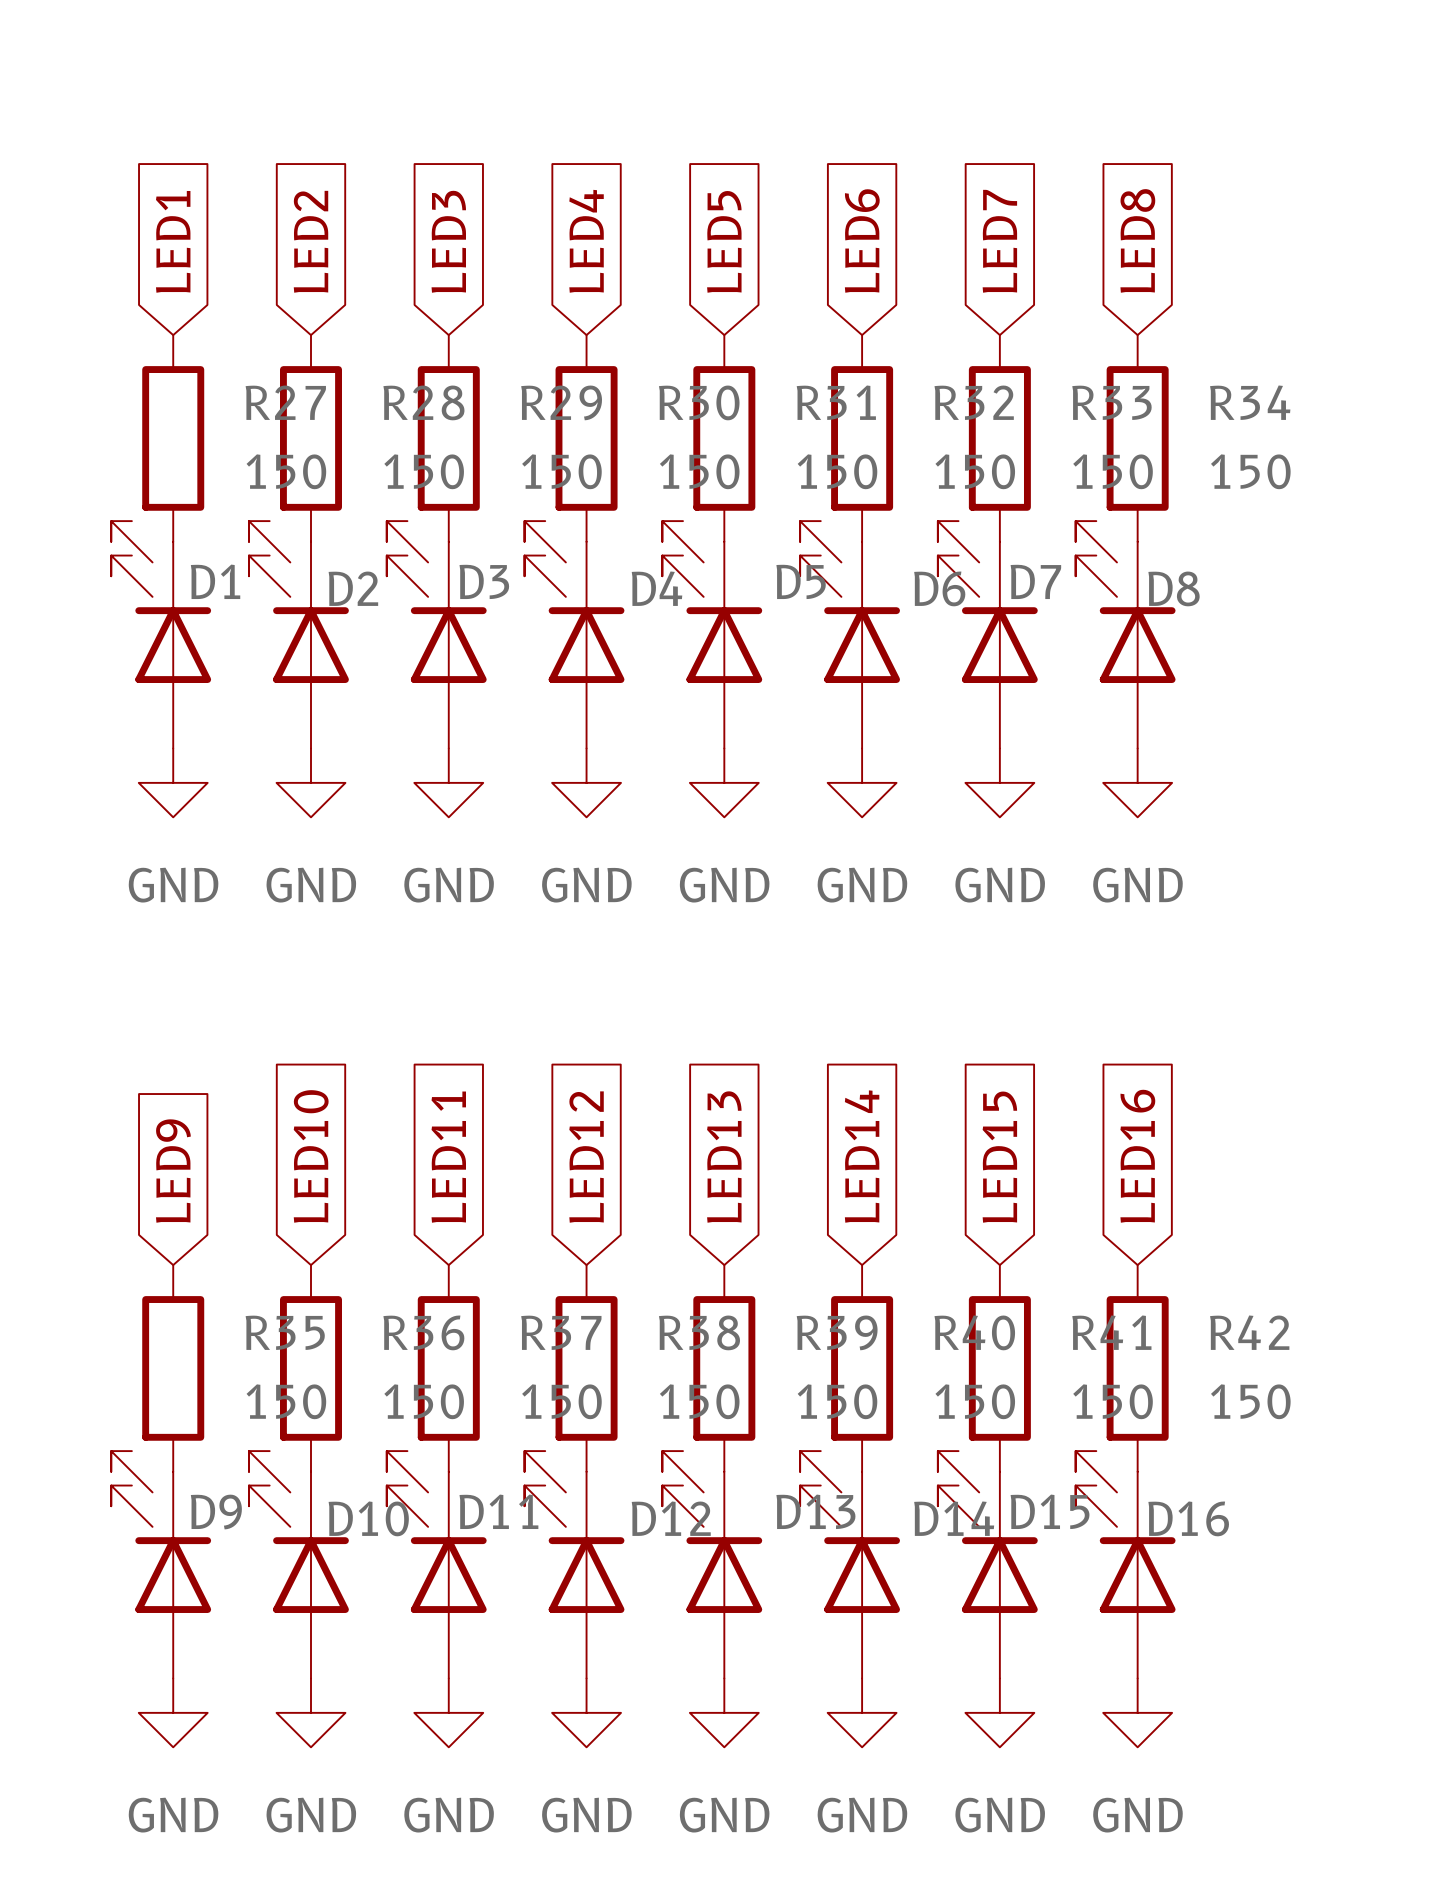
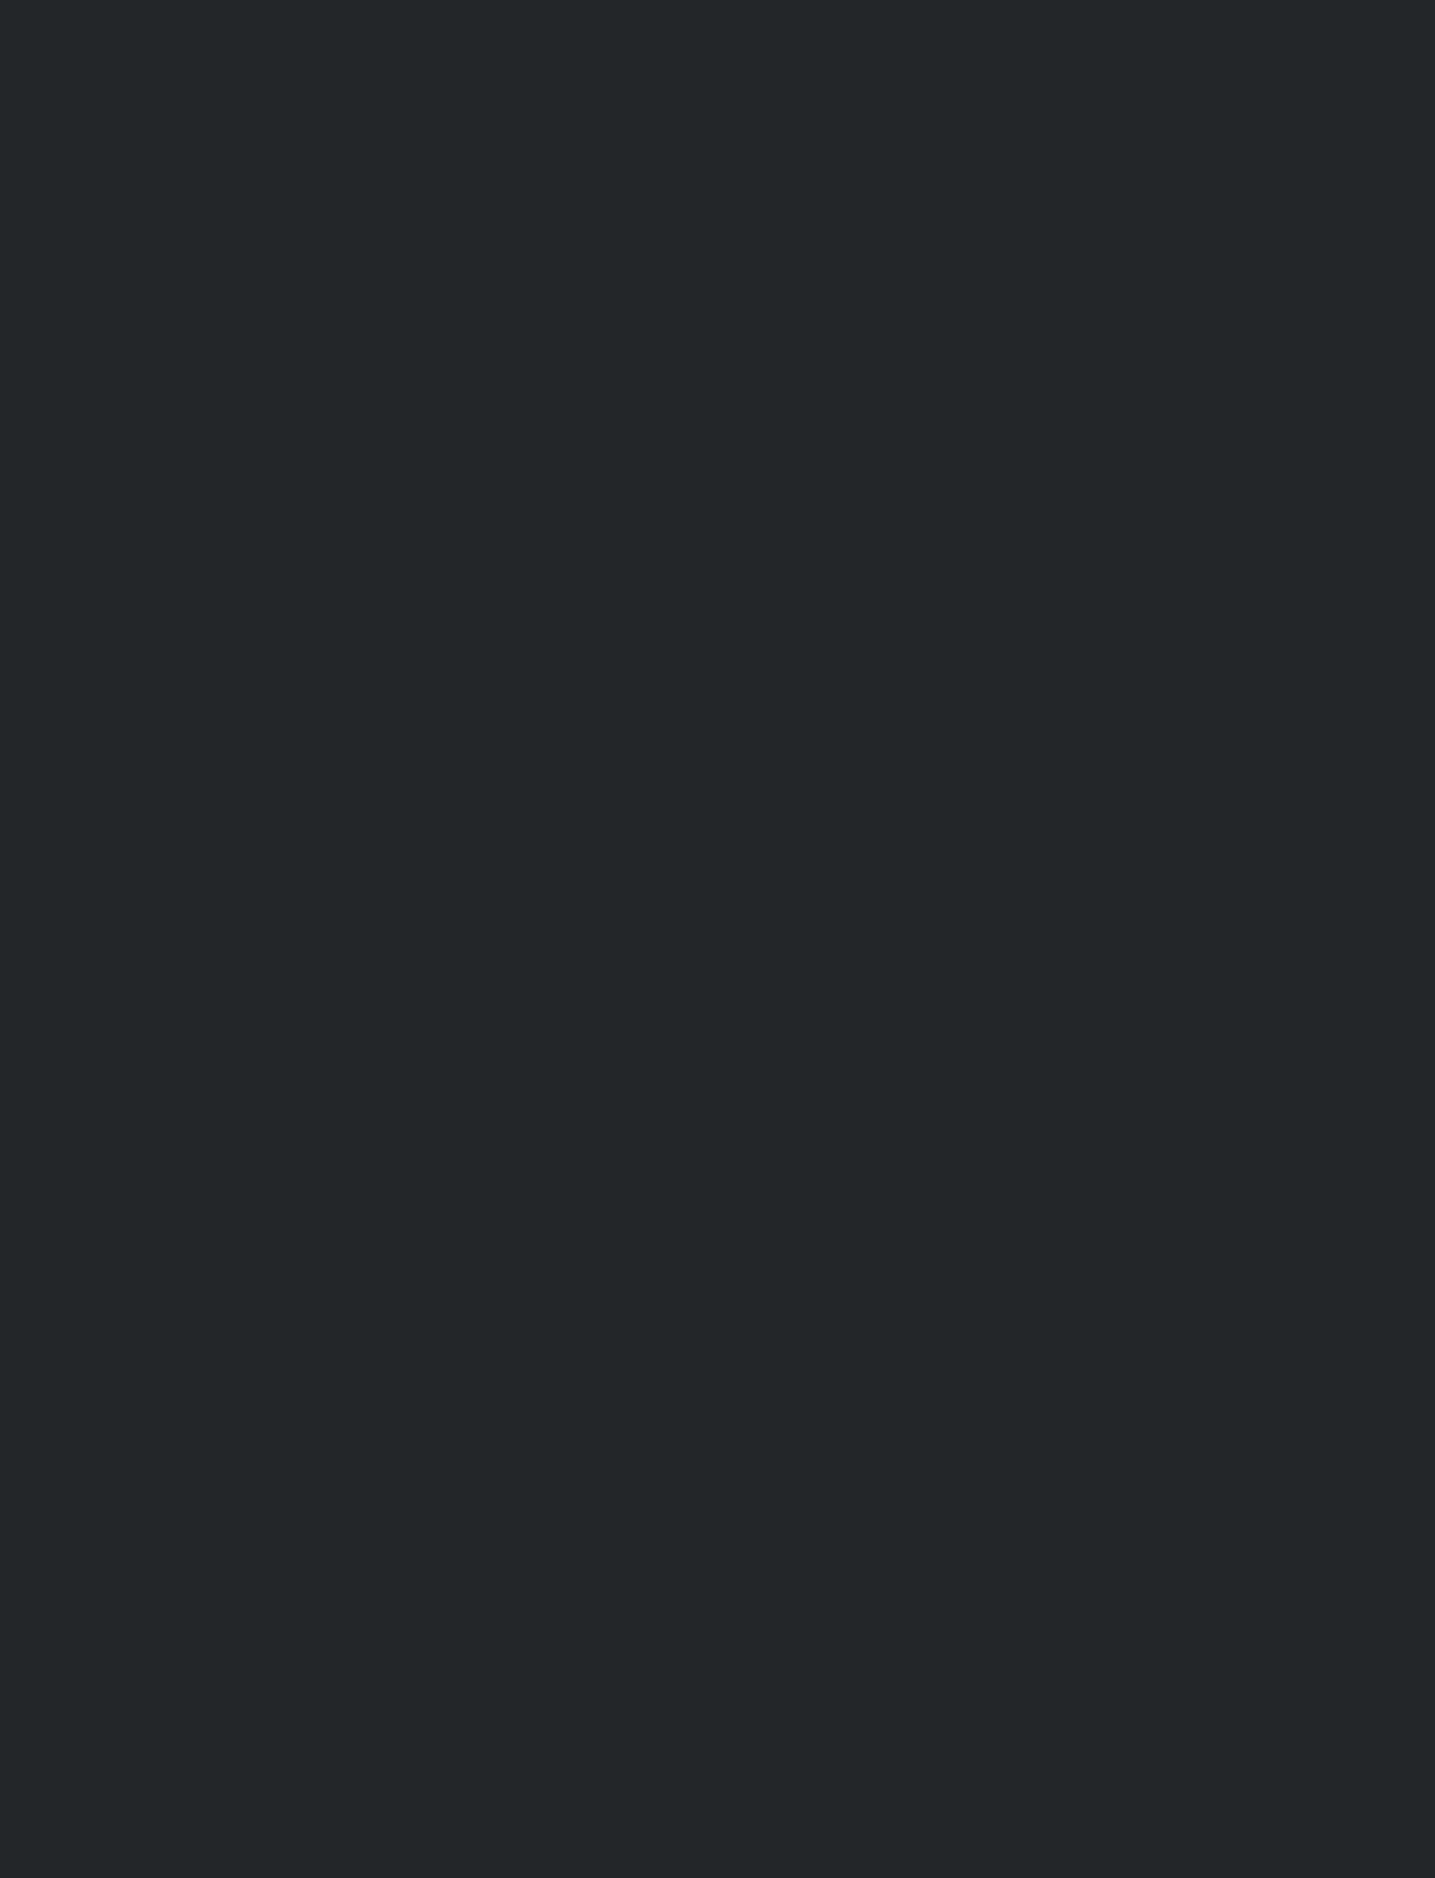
global label: LED6 (862, 240) -> none
global label: LED8 (1137, 240) -> none
global label: LED1 (173, 241) -> none
global label: LED2 (311, 241) -> none
global label: LED3 (448, 241) -> none
global label: LED4 (586, 241) -> none
global label: LED5 (724, 241) -> none
global label: LED7 (999, 241) -> none
R27: 150 (173, 438) -> none
R28: 150 (311, 438) -> none
R29: 150 (448, 438) -> none
R30: 150 (586, 438) -> none
R31: 150 (724, 438) -> none
R32: 150 (862, 438) -> none
R33: 150 (999, 438) -> none
R34: 150 (1137, 438) -> none
D1: (161, 634) -> none
D2: (298, 634) -> none
D3: (436, 634) -> none
D4: (574, 634) -> none
D5: (712, 634) -> none
D6: (850, 634) -> none
D7: (987, 634) -> none
D8: (1125, 634) -> none
power symbol: GND (173, 782) -> none
power symbol: GND (311, 782) -> none
power symbol: GND (448, 782) -> none
power symbol: GND (586, 782) -> none
power symbol: GND (724, 782) -> none
power symbol: GND (862, 782) -> none
power symbol: GND (999, 782) -> none
power symbol: GND (1137, 782) -> none
global label: LED10 (311, 1156) -> none
global label: LED14 (862, 1156) -> none
global label: LED16 (1137, 1156) -> none
global label: LED11 (448, 1157) -> none
global label: LED12 (586, 1157) -> none
global label: LED13 (724, 1157) -> none
global label: LED15 (999, 1157) -> none
global label: LED9 (173, 1171) -> none
R35: 150 (173, 1368) -> none
R36: 150 (311, 1368) -> none
R37: 150 (448, 1368) -> none
R38: 150 (586, 1368) -> none
R39: 150 (724, 1368) -> none
R40: 150 (862, 1368) -> none
R41: 150 (999, 1368) -> none
R42: 150 (1137, 1368) -> none
D9: (161, 1564) -> none
D10: (298, 1564) -> none
D11: (436, 1564) -> none
D12: (574, 1564) -> none
D13: (712, 1564) -> none
D14: (850, 1564) -> none
D15: (987, 1564) -> none
D16: (1125, 1564) -> none
power symbol: GND (173, 1712) -> none
power symbol: GND (311, 1712) -> none
power symbol: GND (448, 1712) -> none
power symbol: GND (586, 1712) -> none
power symbol: GND (724, 1712) -> none
power symbol: GND (862, 1712) -> none
power symbol: GND (999, 1712) -> none
power symbol: GND (1137, 1712) -> none

